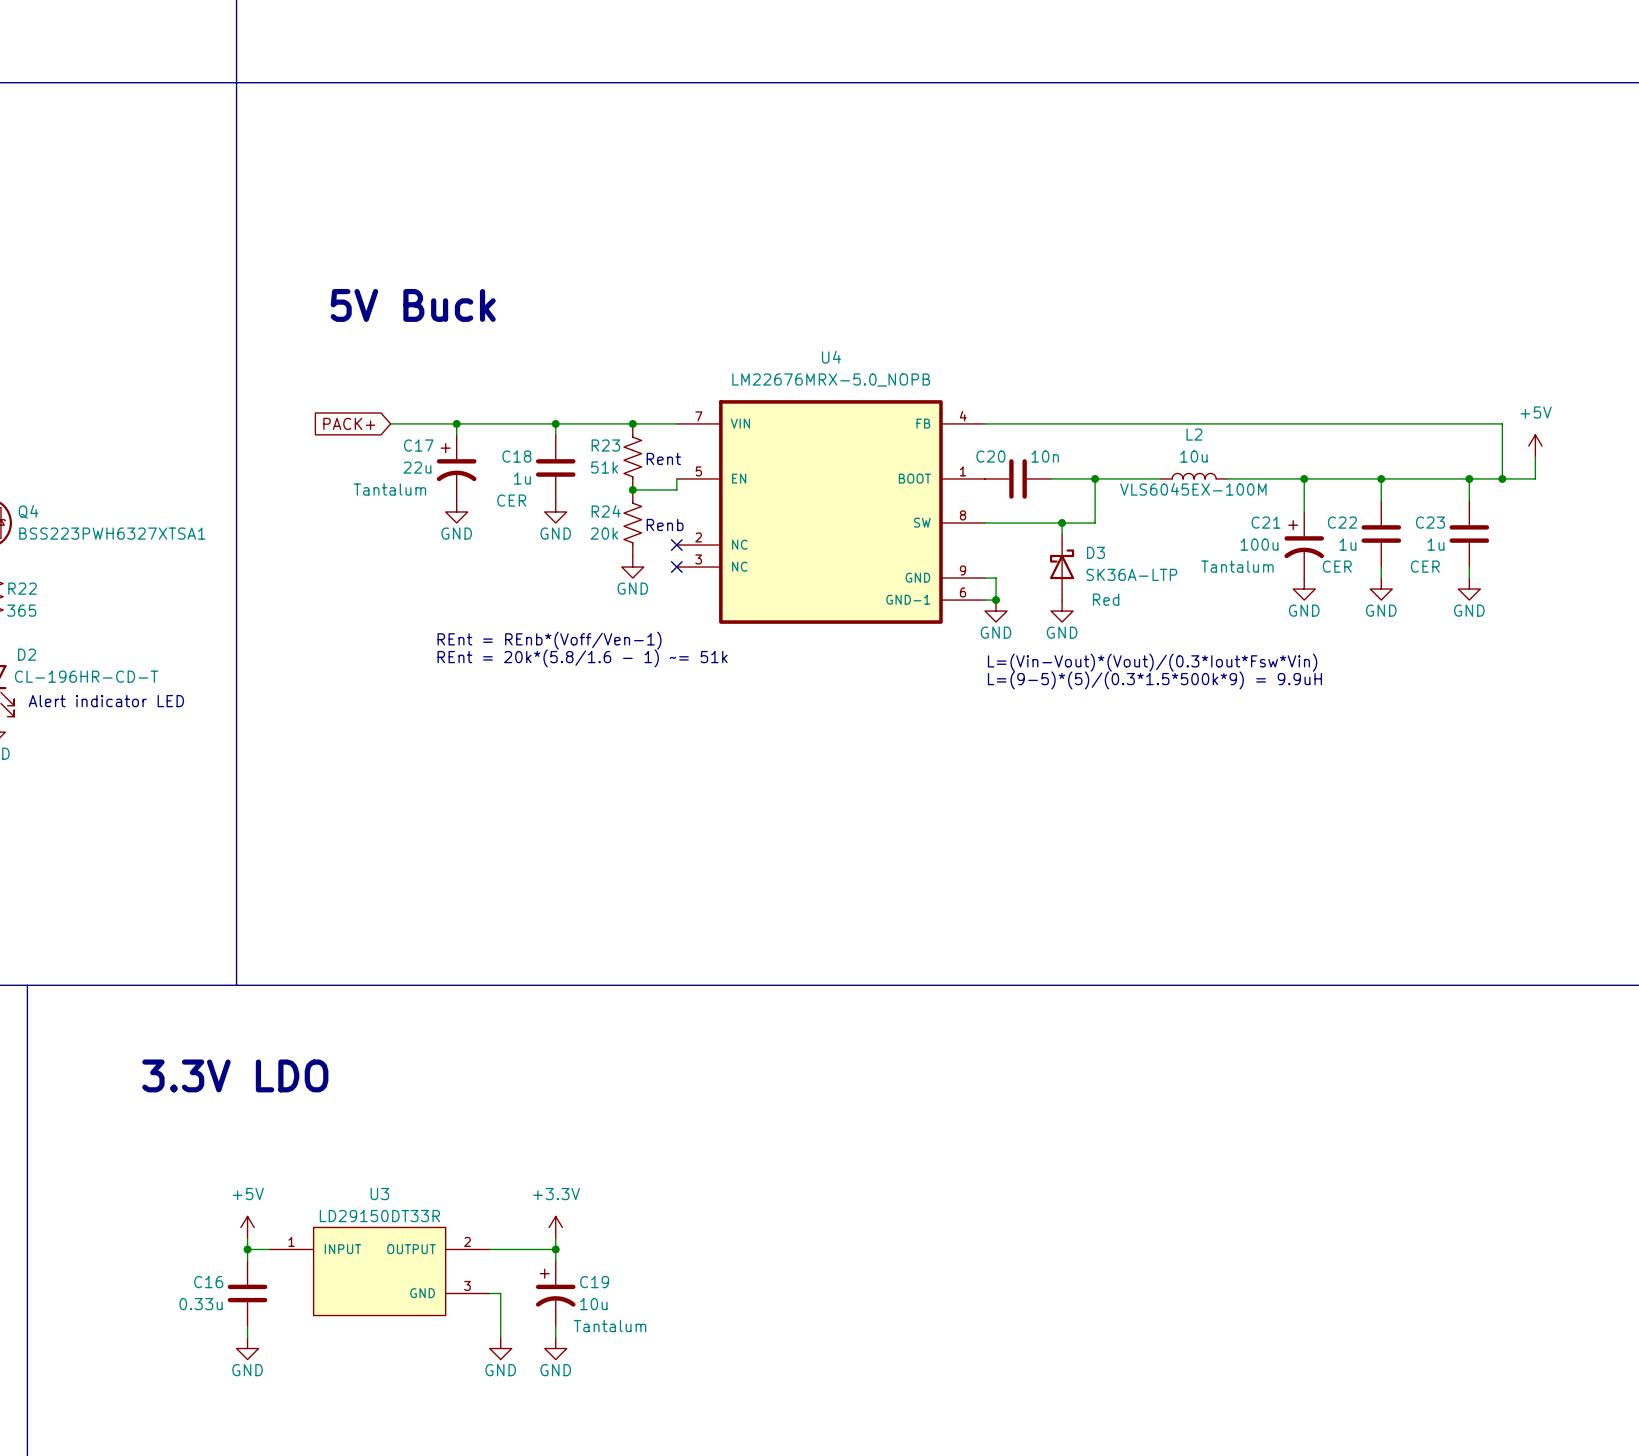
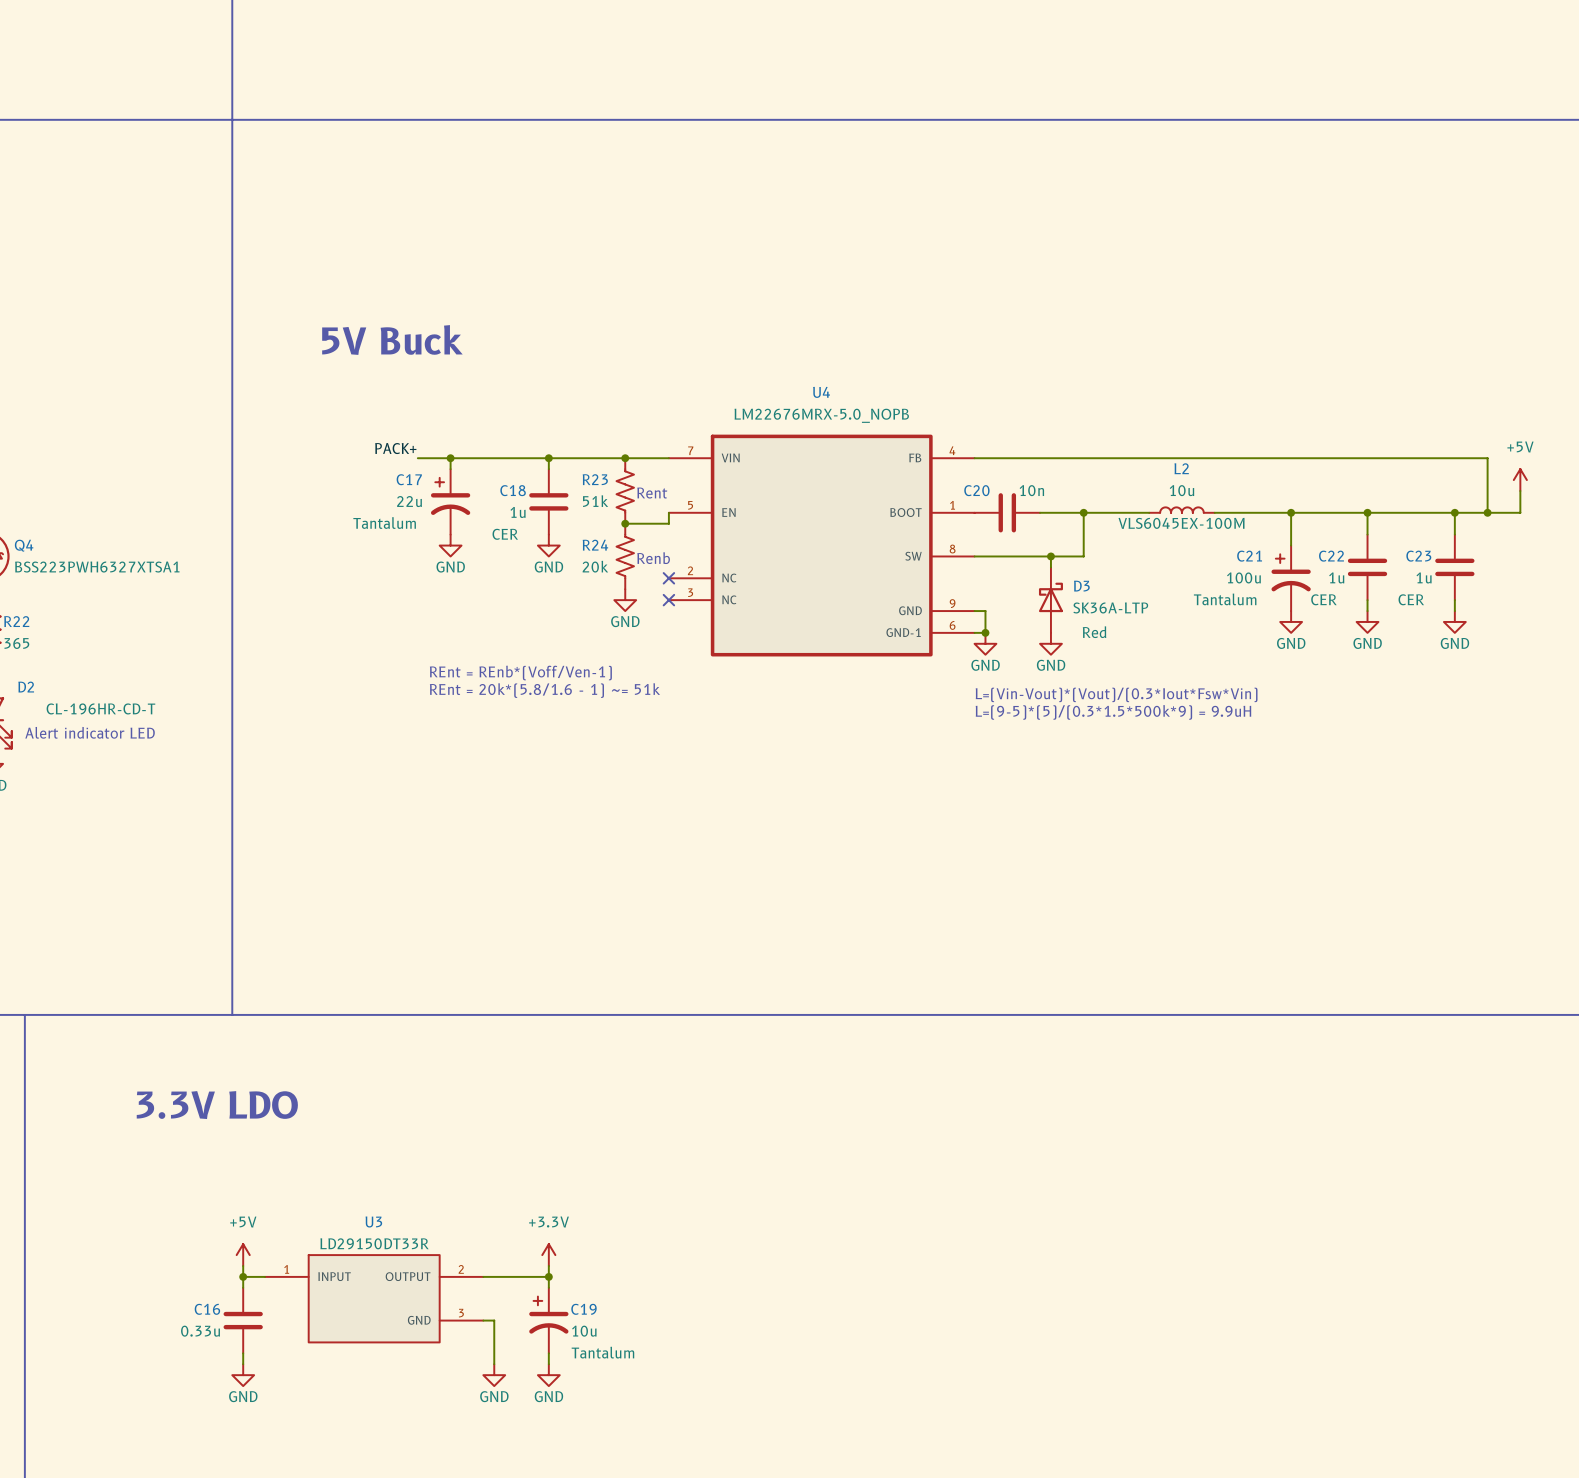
label: none -> PACK+ (395, 448)
global label: PACK+ (349, 423) -> none
wire: (390, 423) (423, 423) -> none

